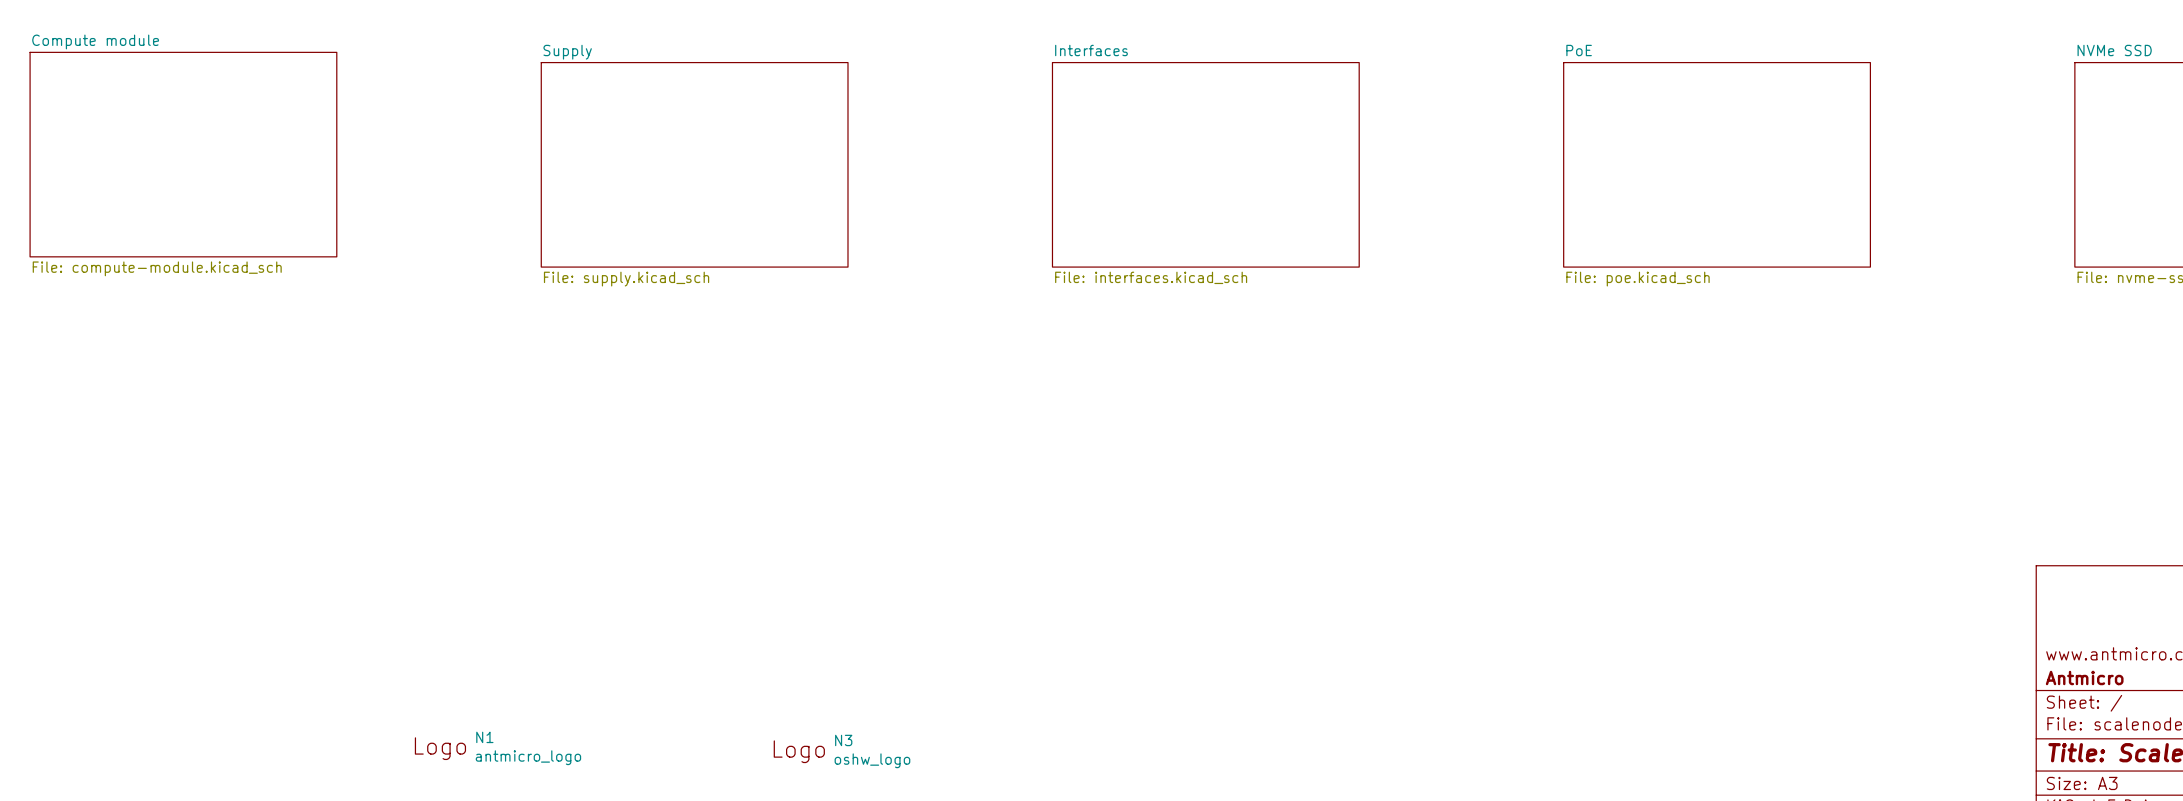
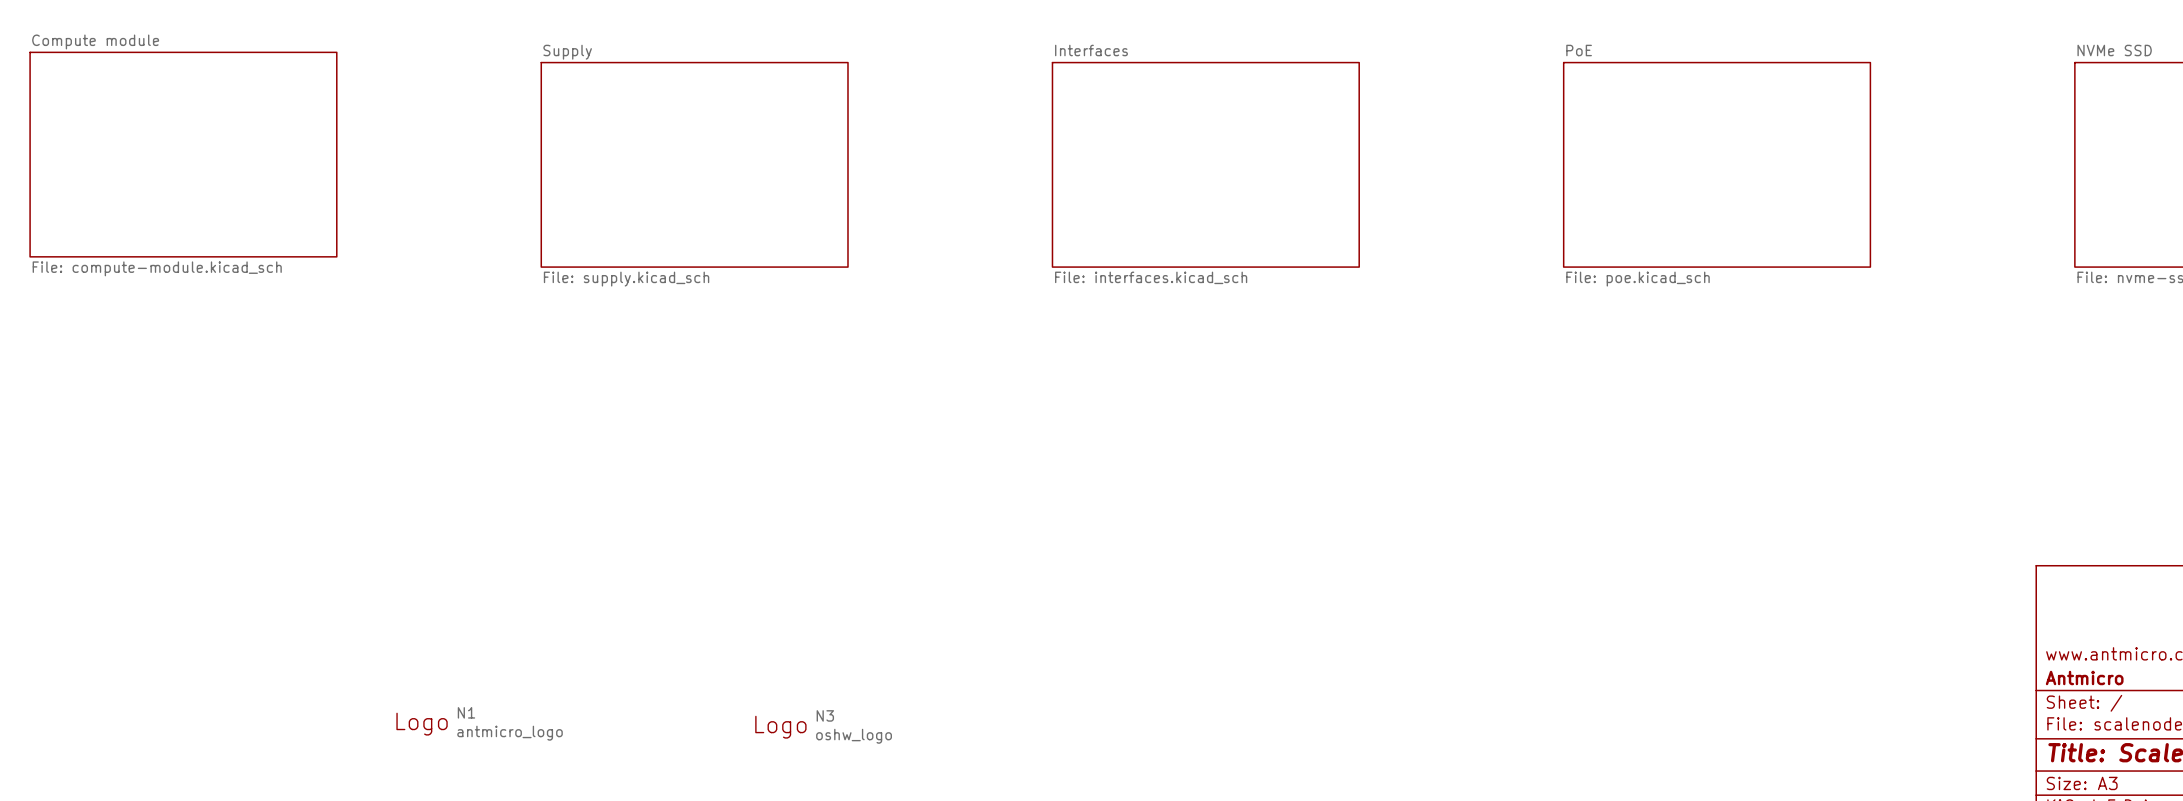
N1 position: (497, 748) -> (479, 723)
N3 position: (842, 751) -> (823, 726)

